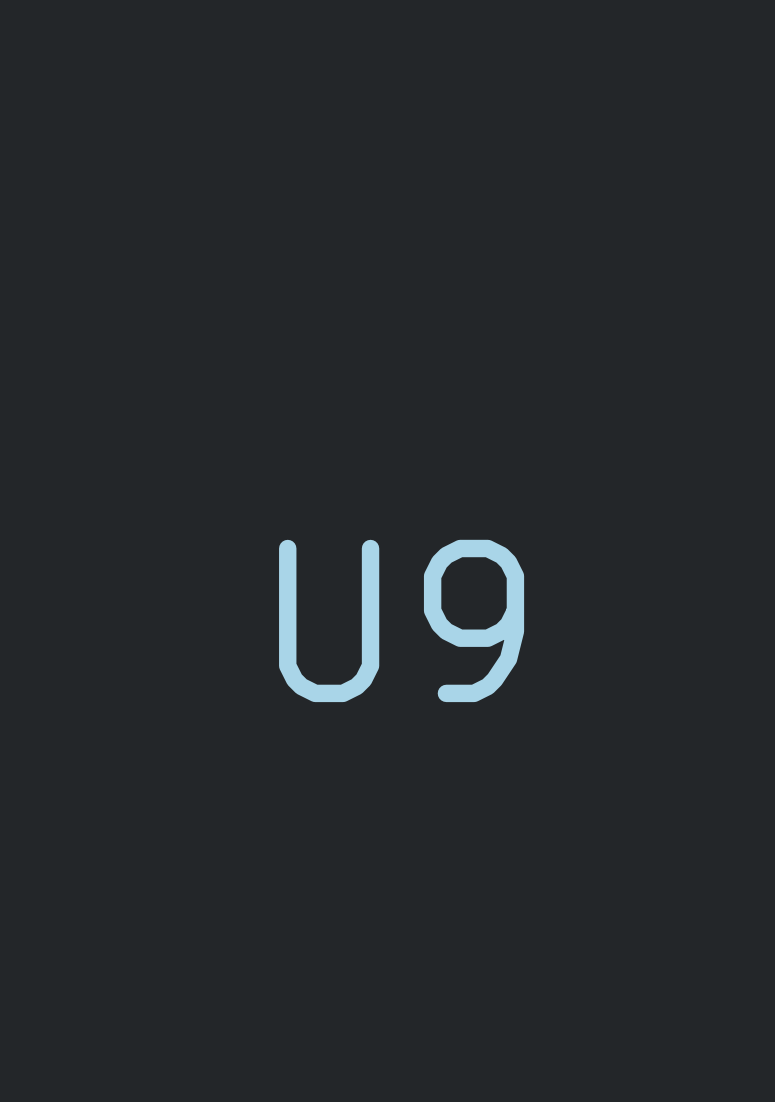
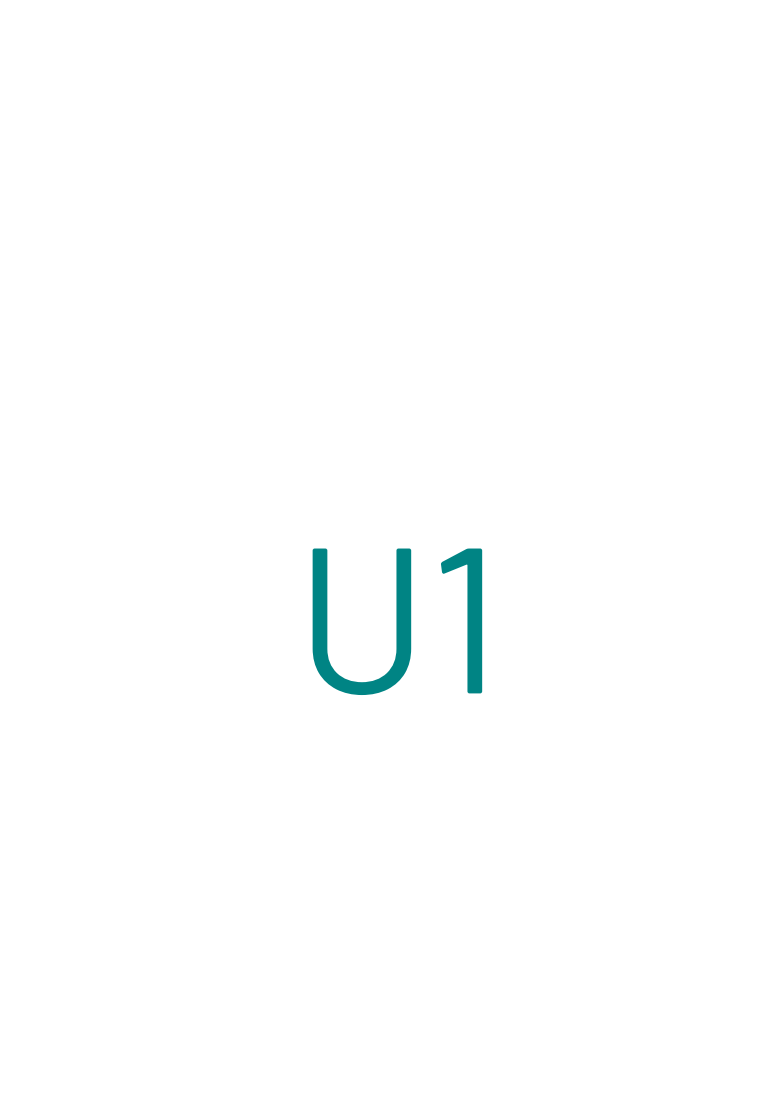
U9 name: U9 (401, 620) -> U1 (397, 621)

